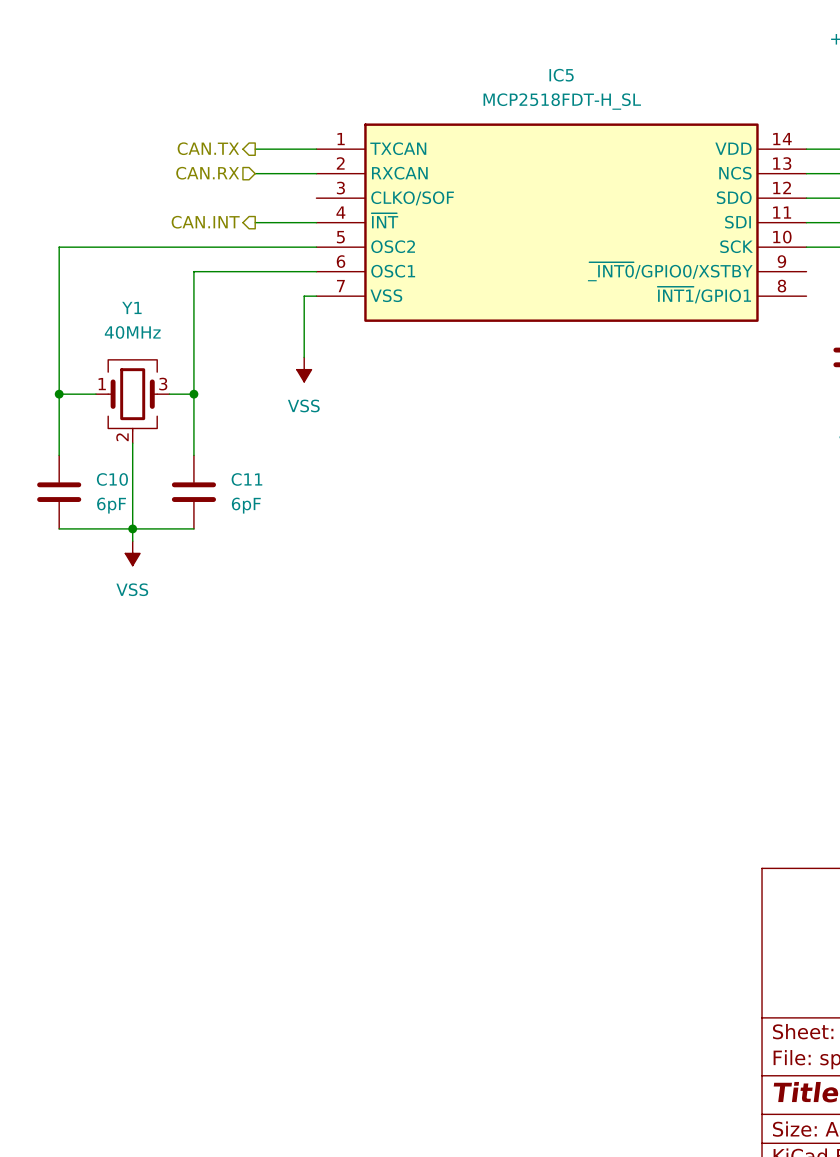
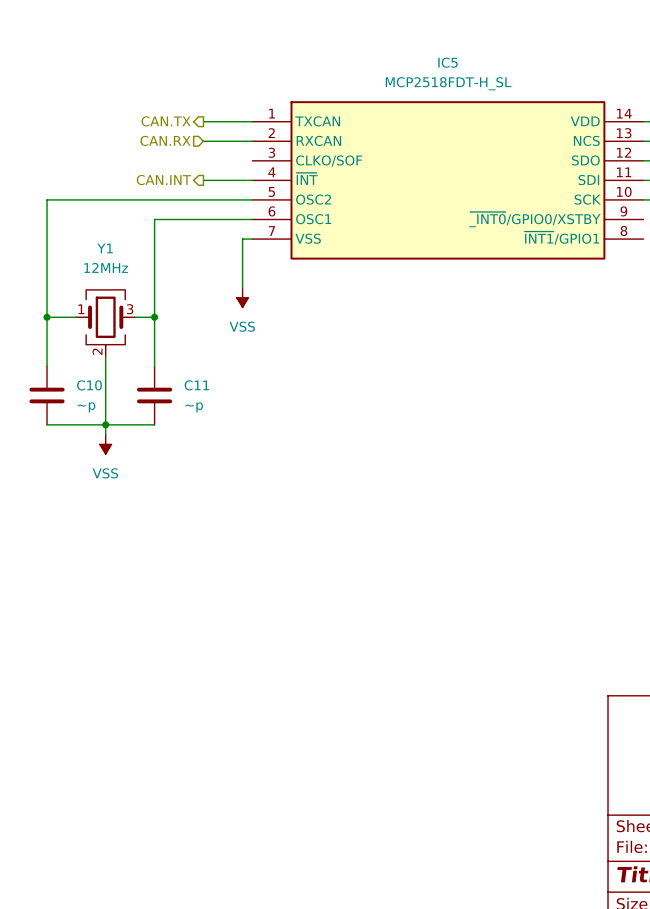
Y1 value: 40MHz (132, 332) -> 12MHz (106, 267)
C10 value: 6pF (111, 505) -> ~p (86, 407)
C11 value: 6pF (246, 505) -> ~p (194, 407)

